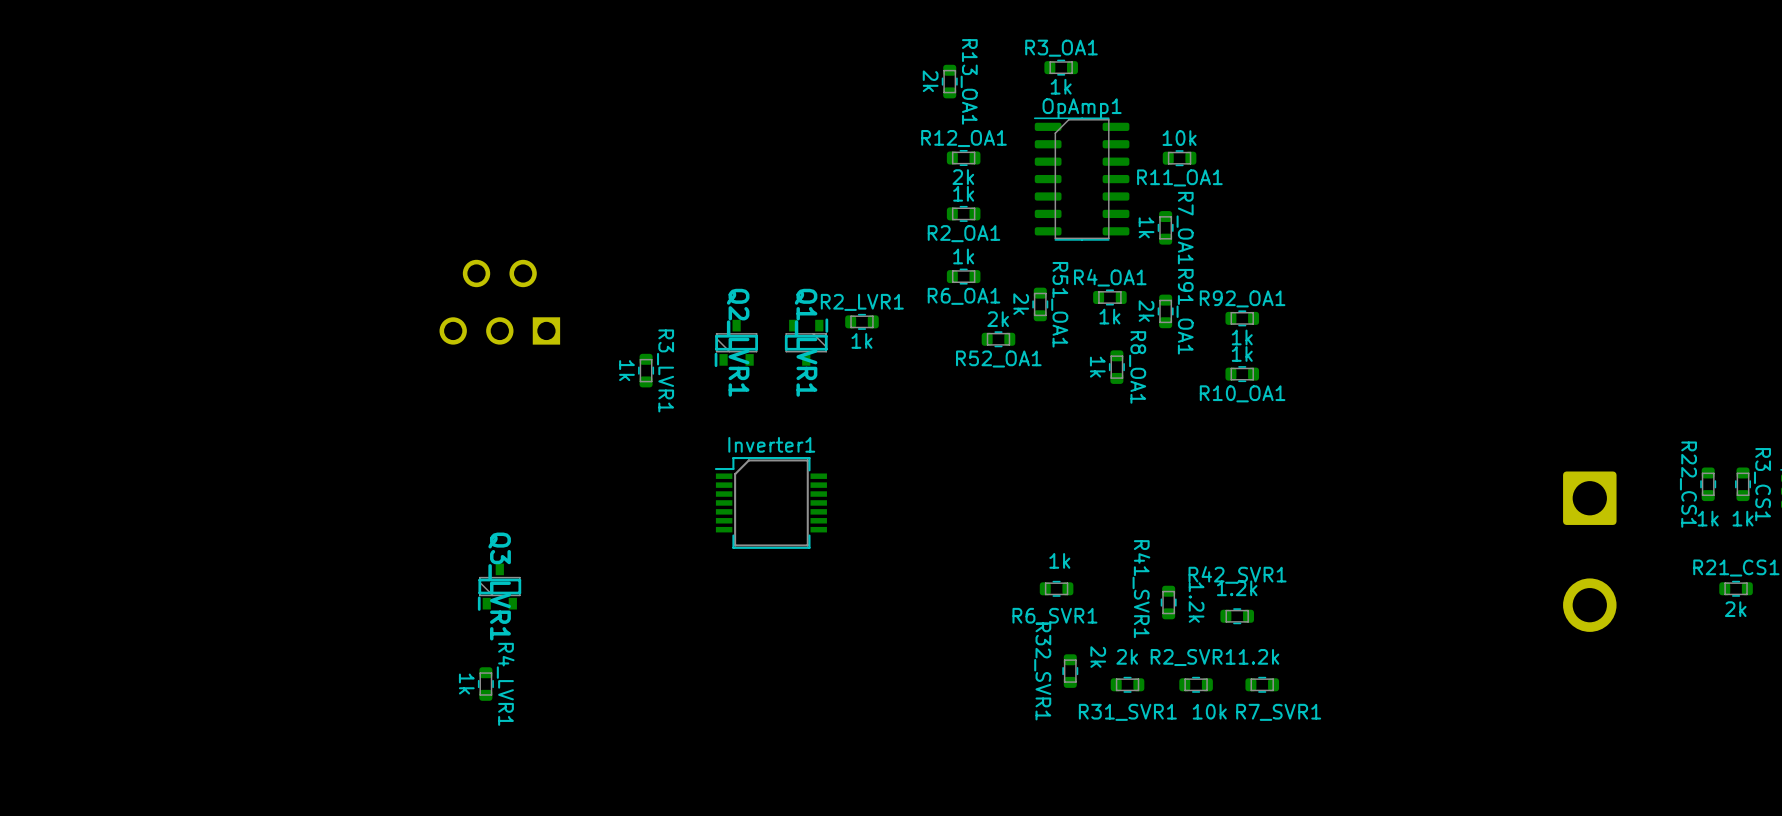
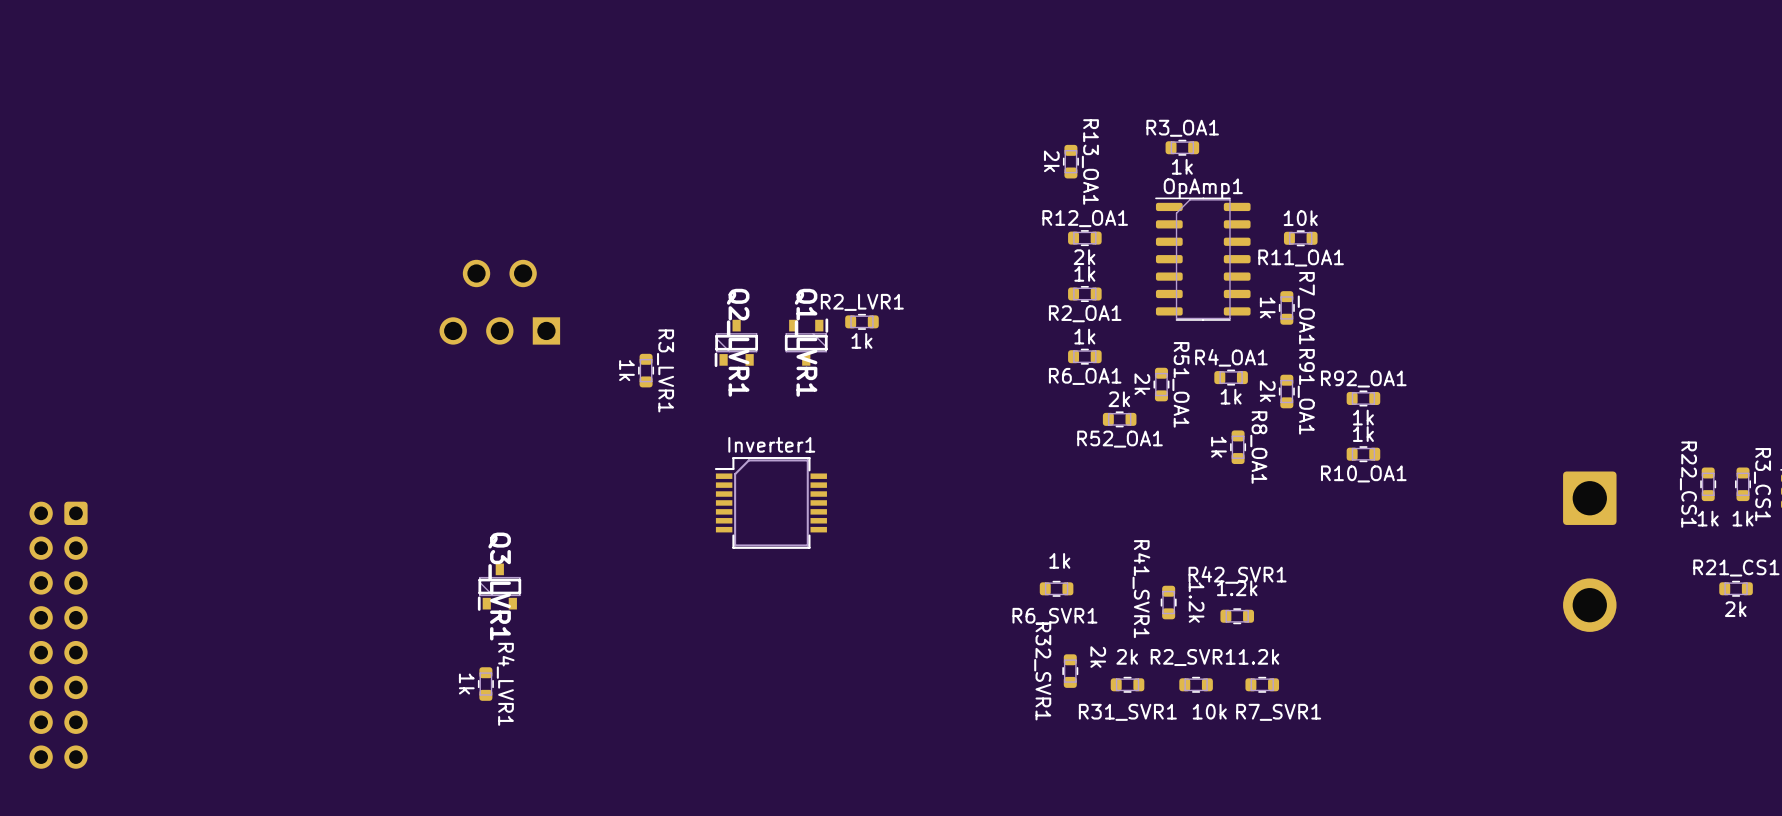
R3_OA1 position: (1061, 67) -> (1182, 147)
R13_OA1 position: (949, 81) -> (1070, 161)
R12_OA1 position: (963, 157) -> (1084, 238)
R11_OA1 position: (1179, 158) -> (1300, 238)
OpAmp1 position: (1081, 179) -> (1202, 259)
R2_OA1 position: (963, 213) -> (1084, 294)
R7_OA1 position: (1165, 227) -> (1286, 307)
R6_OA1 position: (963, 276) -> (1084, 356)
R4_OA1 position: (1109, 297) -> (1231, 377)
R51_OA1 position: (1040, 304) -> (1161, 384)
R91_OA1 position: (1165, 311) -> (1286, 391)
R92_OA1 position: (1242, 318) -> (1363, 398)
R52_OA1 position: (998, 339) -> (1119, 419)
R8_OA1 position: (1116, 367) -> (1238, 447)
R10_OA1 position: (1242, 374) -> (1363, 454)
part: none -> (58, 635)

